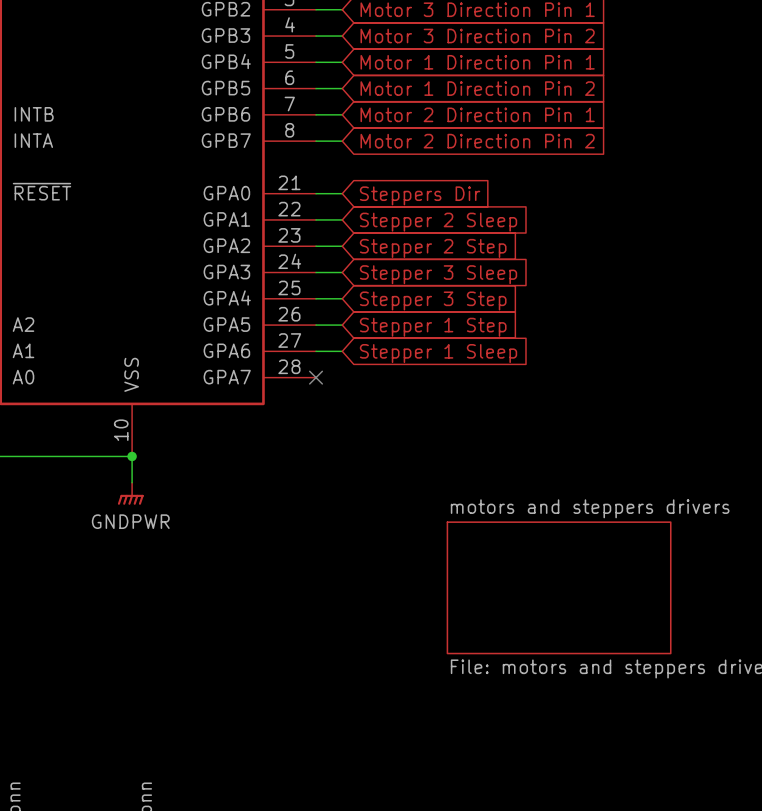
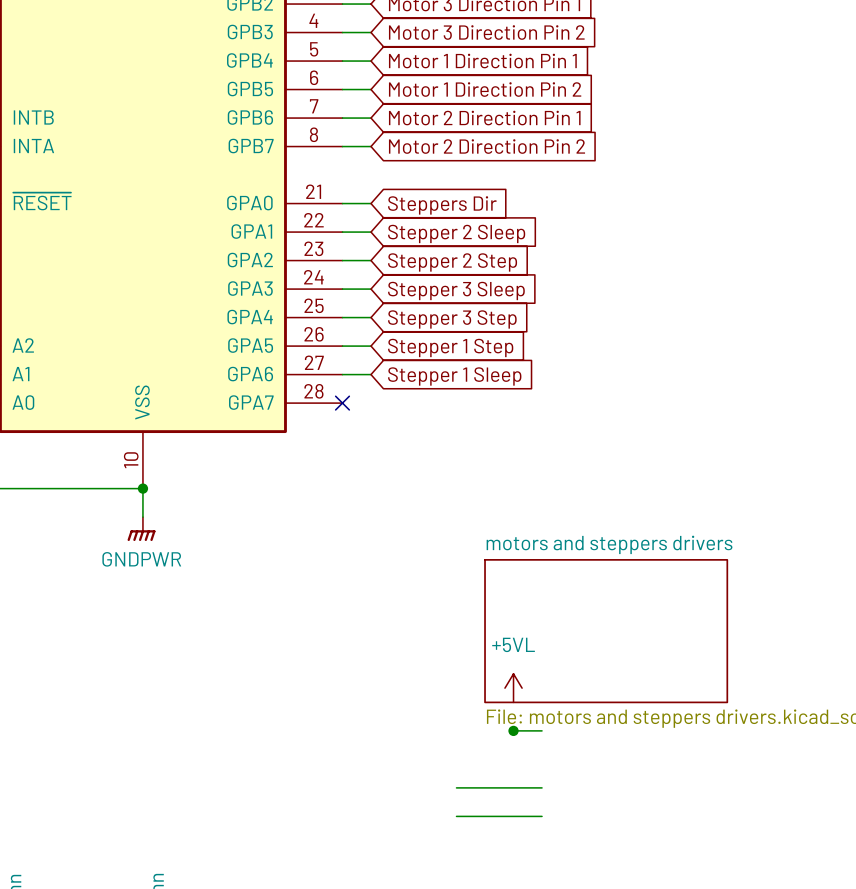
power symbol: none -> +5VL (513, 688)
wire: none -> (513, 730) (542, 730)
junction: none -> (513, 730)
wire: none -> (456, 787) (542, 787)
wire: none -> (456, 816) (542, 816)

